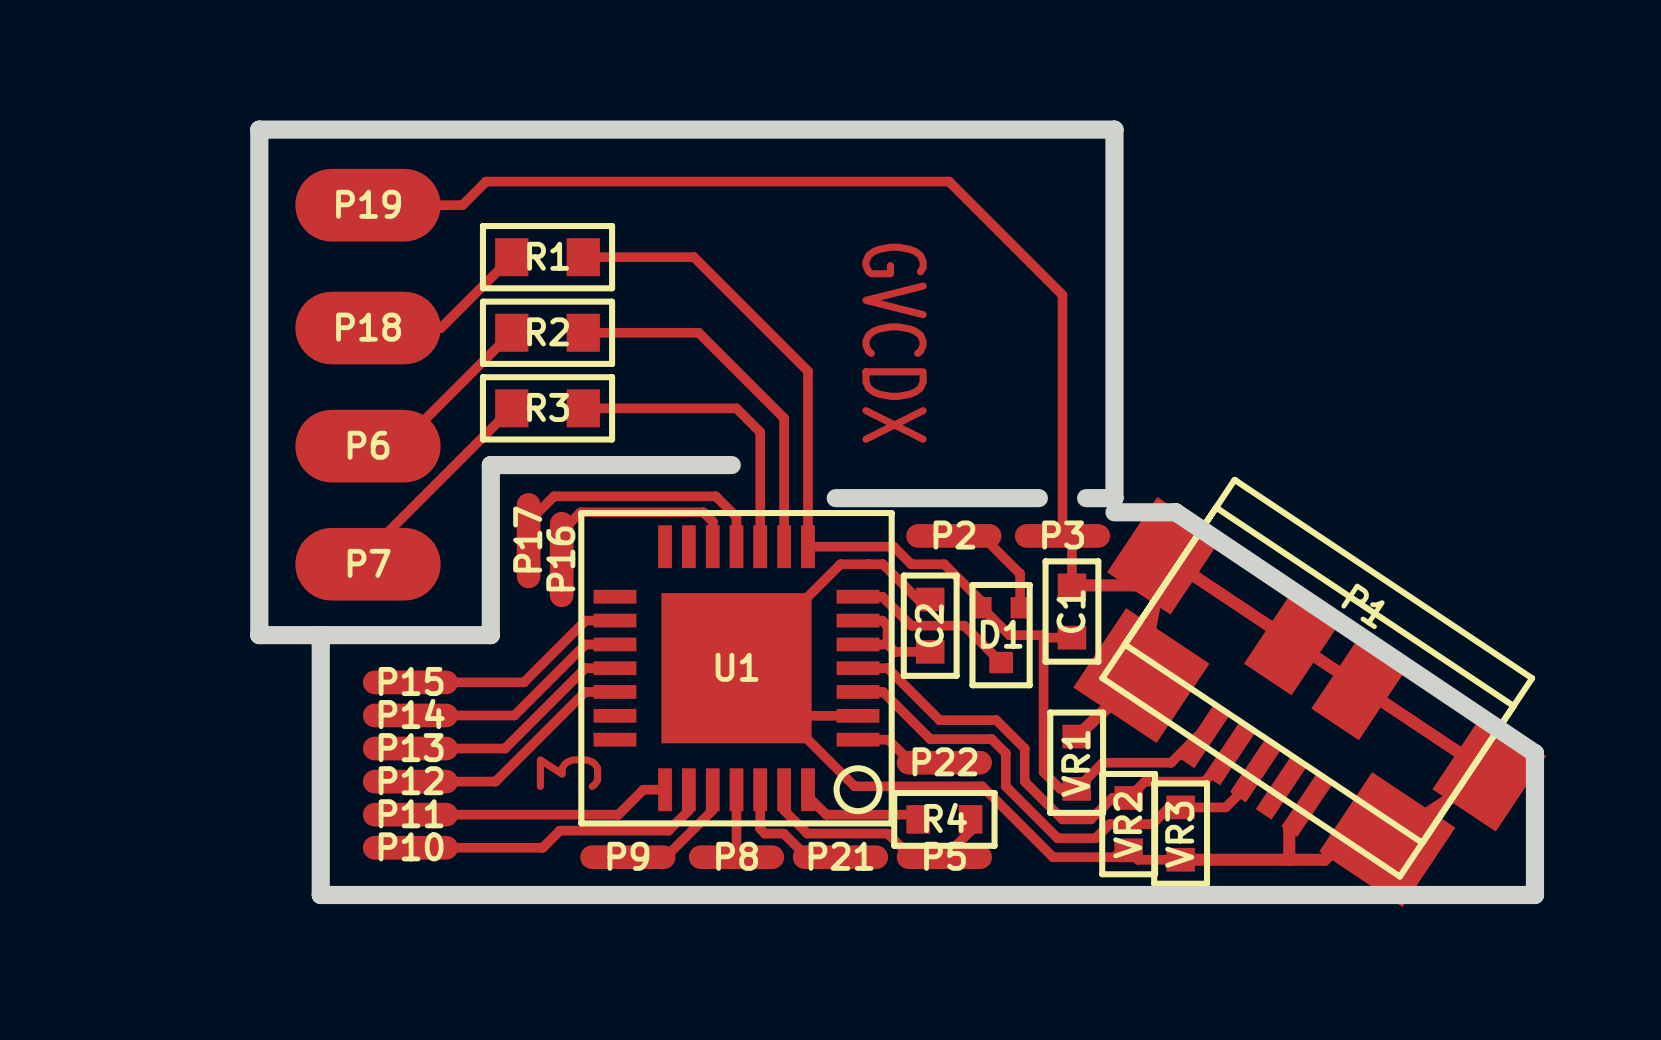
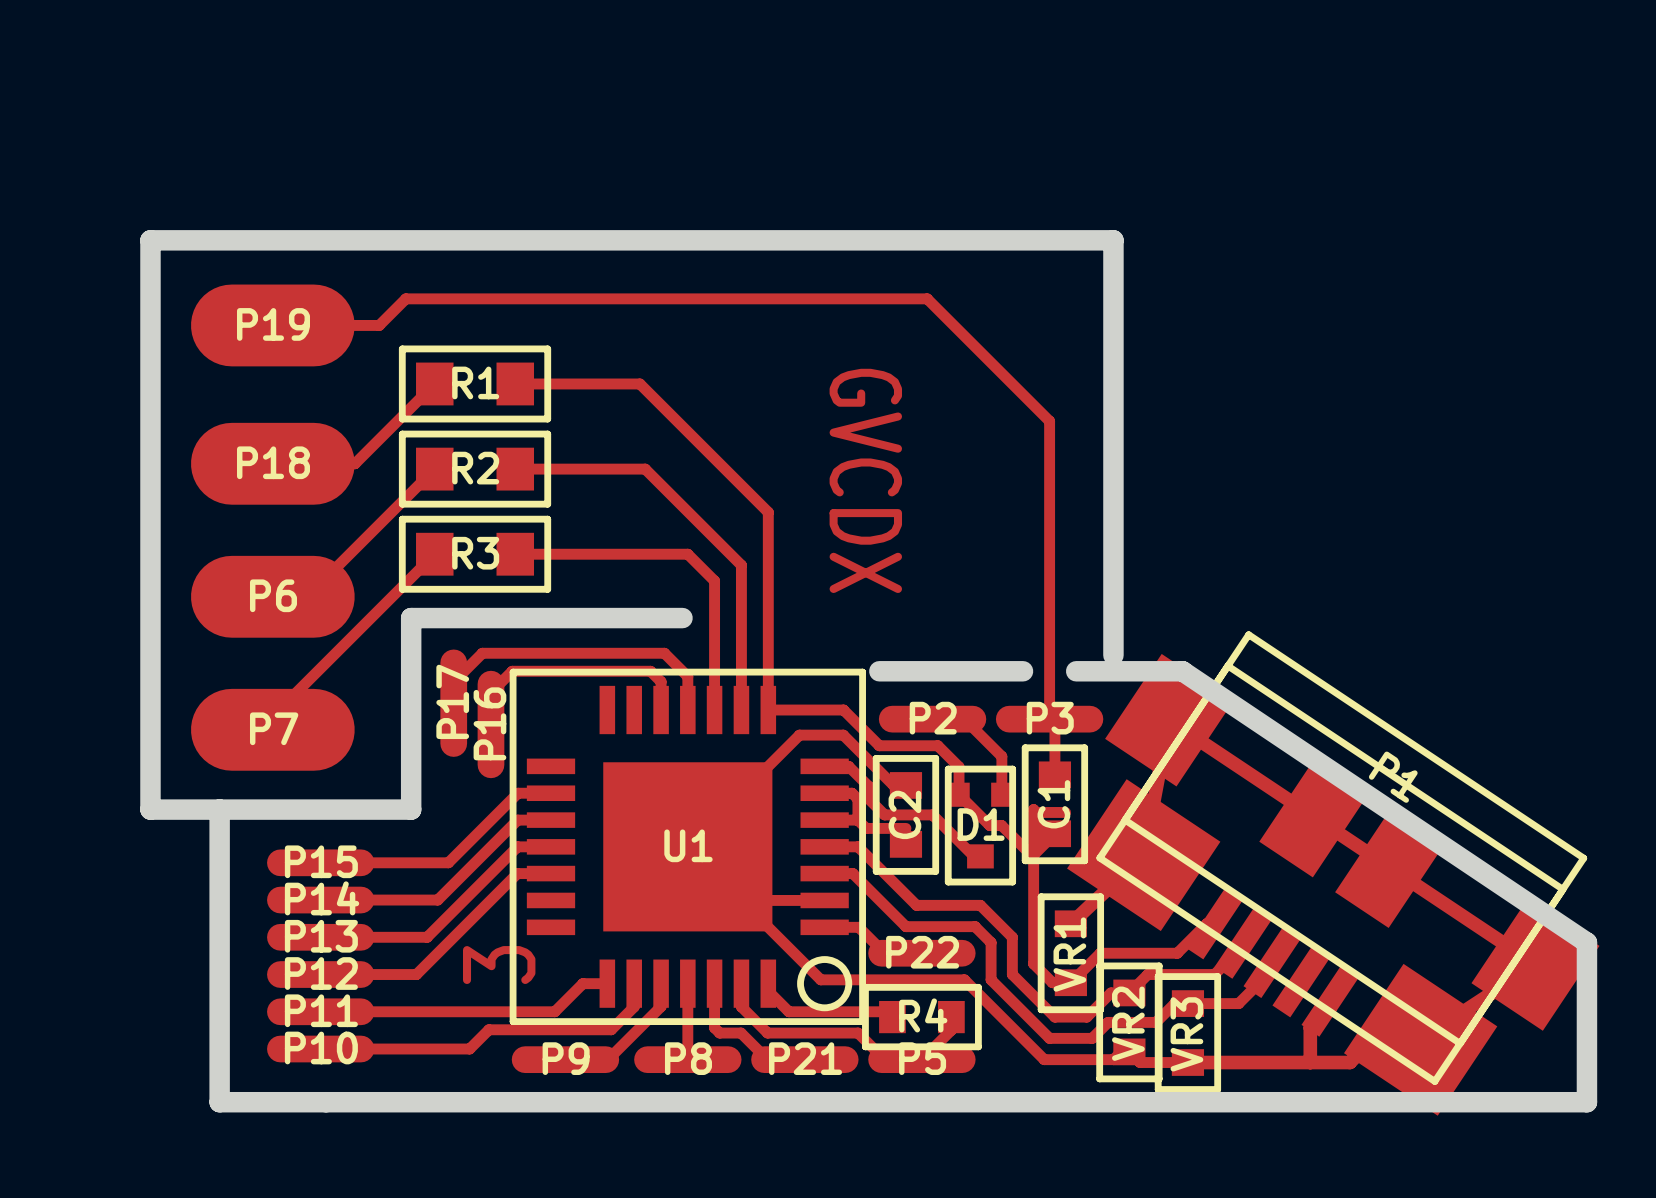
top track: (1057, 290) (1062, 294) (1062, 535) (1071, 545) (1071, 585) (1134, 585) (1163, 555) -> (1049, 421) (1049, 719) (1054, 724) (1054, 774)
board edge: (835, 498) (1038, 498) -> none
board edge: (1086, 498) (1114, 498) -> none
board edge: none -> (879, 671) (1023, 671)
board edge: none -> (1076, 671) (1113, 671)
top track: (953, 535) (982, 535) (1020, 573) (1020, 607) -> none
P2 position: (953, 535) -> (932, 719)
P3 position: (1062, 535) -> (1049, 719)
top track: (874, 546) (893, 546) (911, 564) (944, 564) (958, 578) -> (843, 710) (879, 745) (937, 745)
top track: none -> (932, 719) (964, 719) (1001, 756) (1001, 794)
top track: (835, 569) (840, 564) (882, 564) (918, 599) (930, 599) -> (799, 735) (843, 735) (893, 785) (905, 785)
top track: (879, 596) (882, 596) (911, 625) (964, 625) (1001, 662) -> (848, 766) (868, 786) (868, 798) (884, 814) (932, 814) (974, 856) (980, 856)
top track: (977, 597) (982, 601) (982, 607) (1009, 635) (1043, 635) -> (959, 766) (959, 794) (989, 825) (1001, 825) (1031, 855) (1033, 855) (1054, 833)
C1 position: (1071, 611) -> (1054, 804)
C2 position: (930, 625) -> (905, 814)
D1 position: (1001, 635) -> (980, 825)

